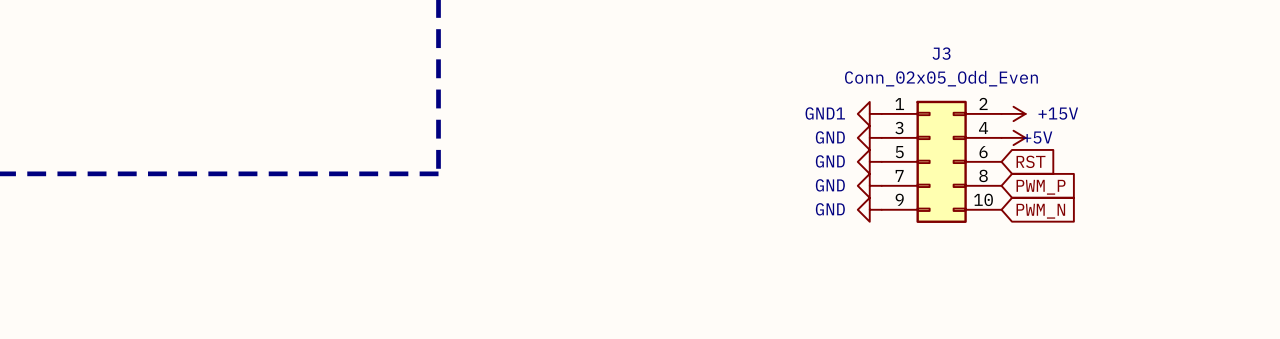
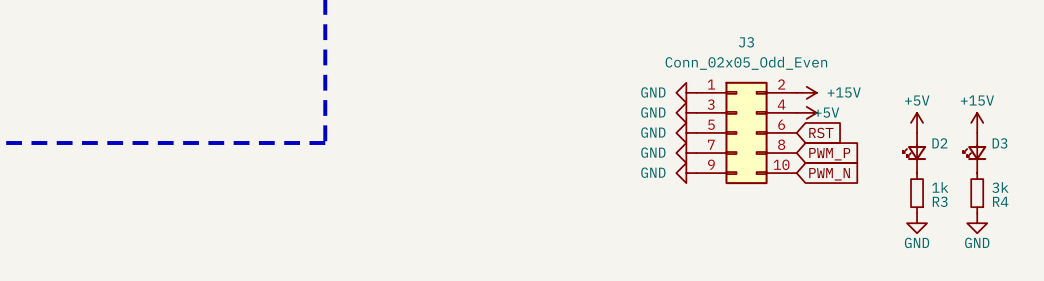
power symbol: GND1 (869, 113) -> GND (686, 92)
power symbol: none -> +5V (917, 122)
power symbol: none -> +15V (977, 122)
D2: none -> (914, 153)
D3: none -> (974, 153)
R3: none -> 1k (917, 193)
R4: none -> 3k (977, 193)
power symbol: none -> GND (917, 223)
power symbol: none -> GND (977, 223)

